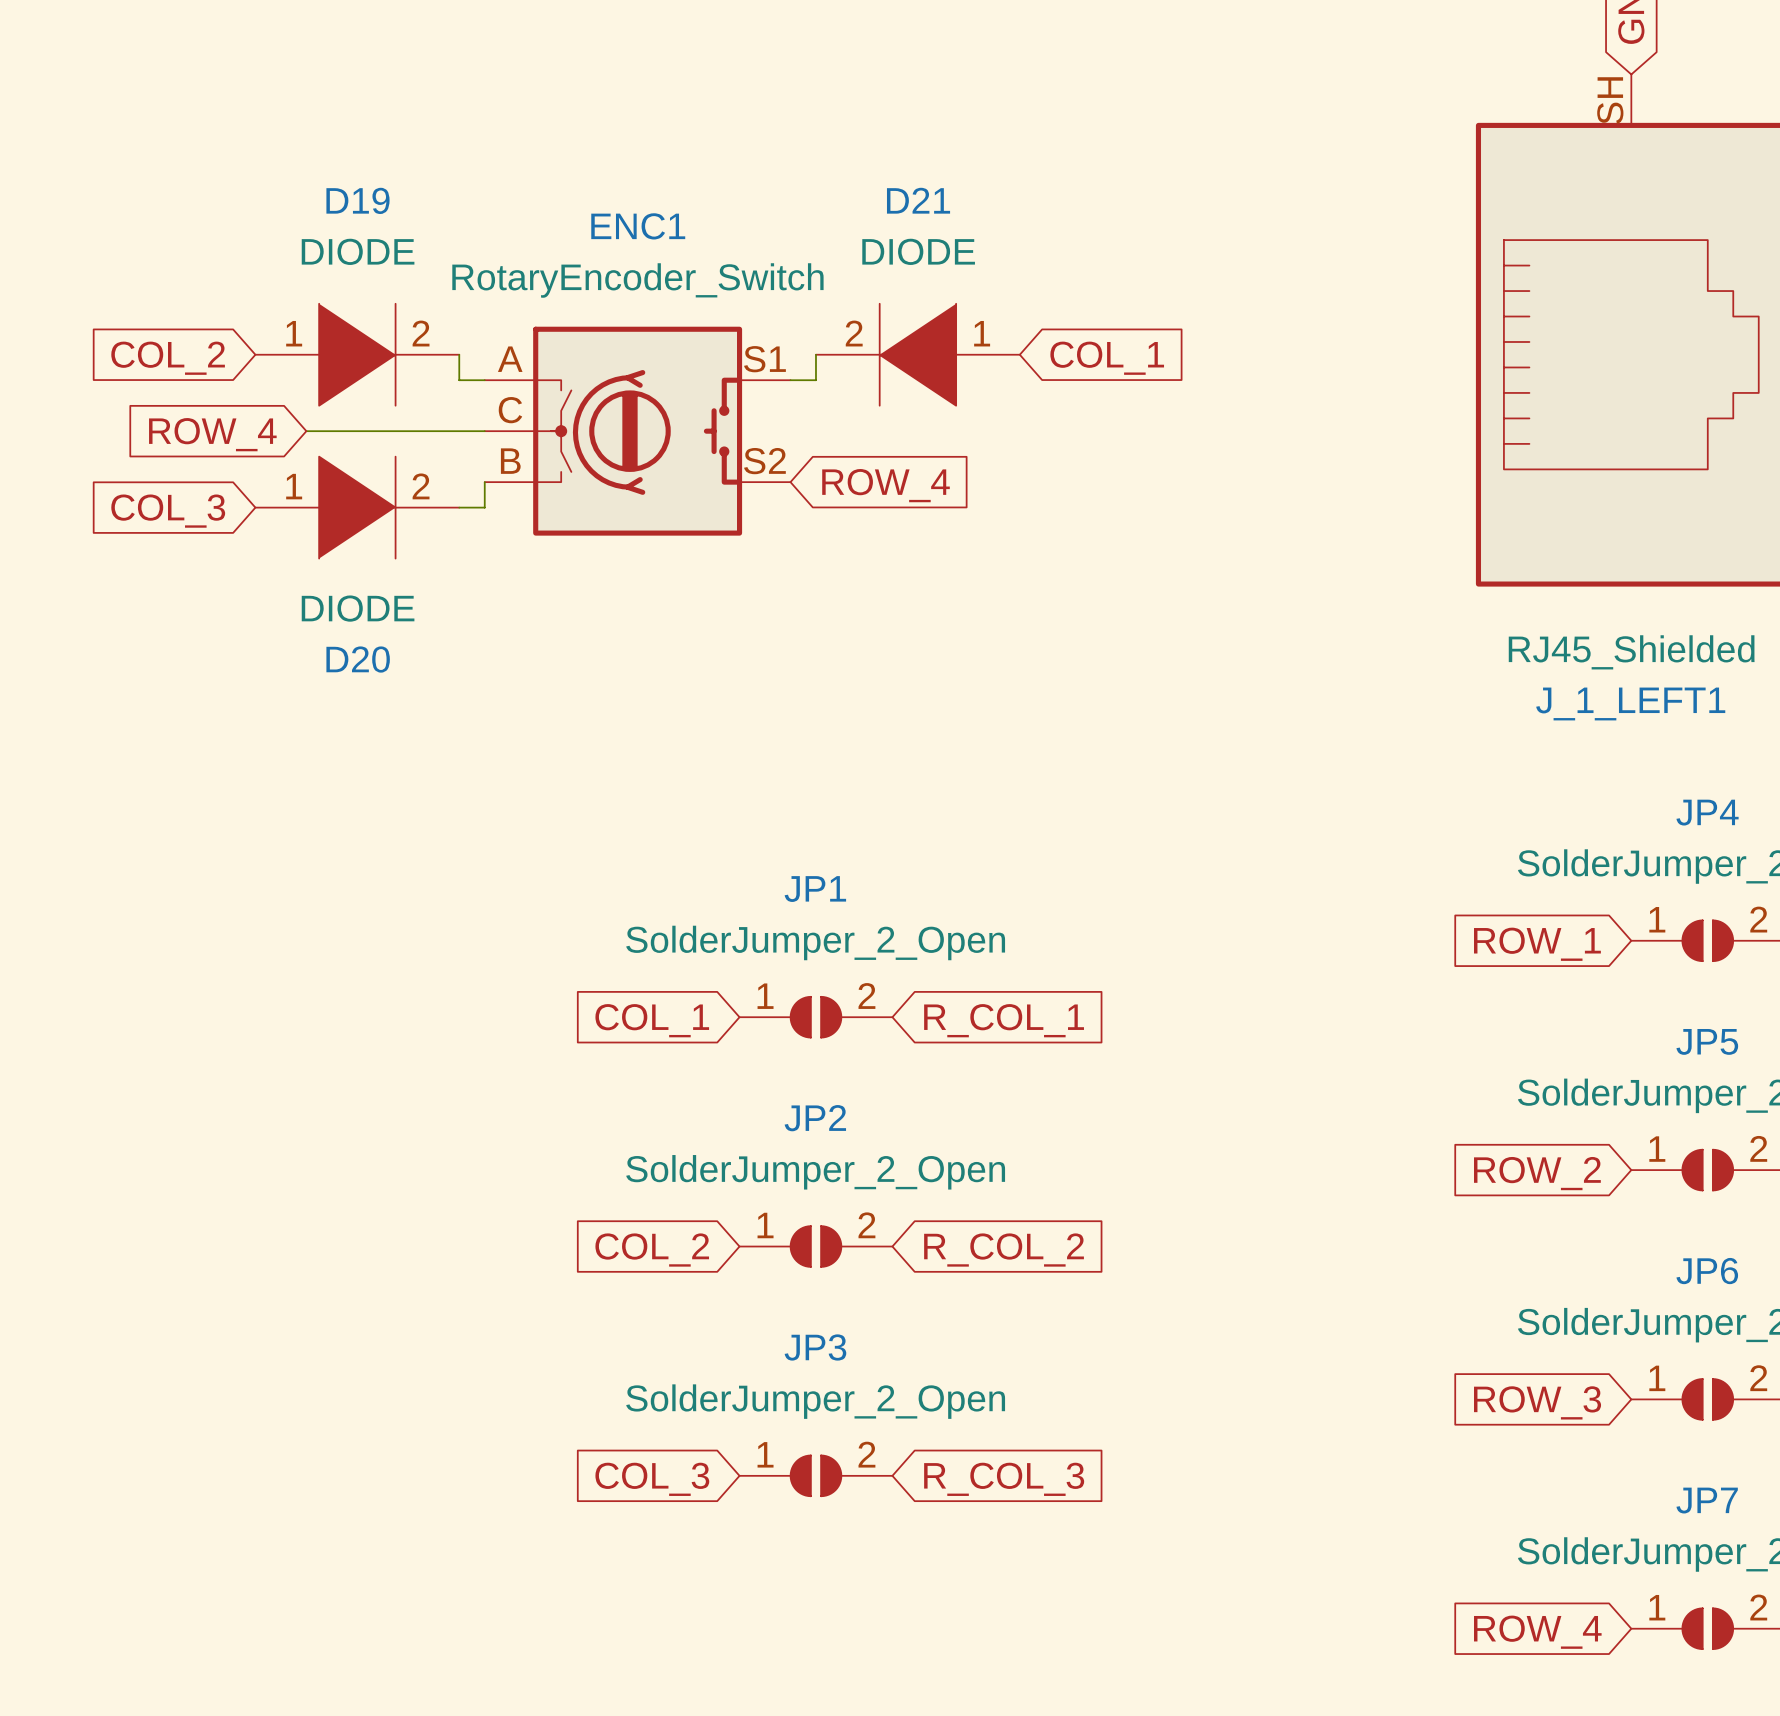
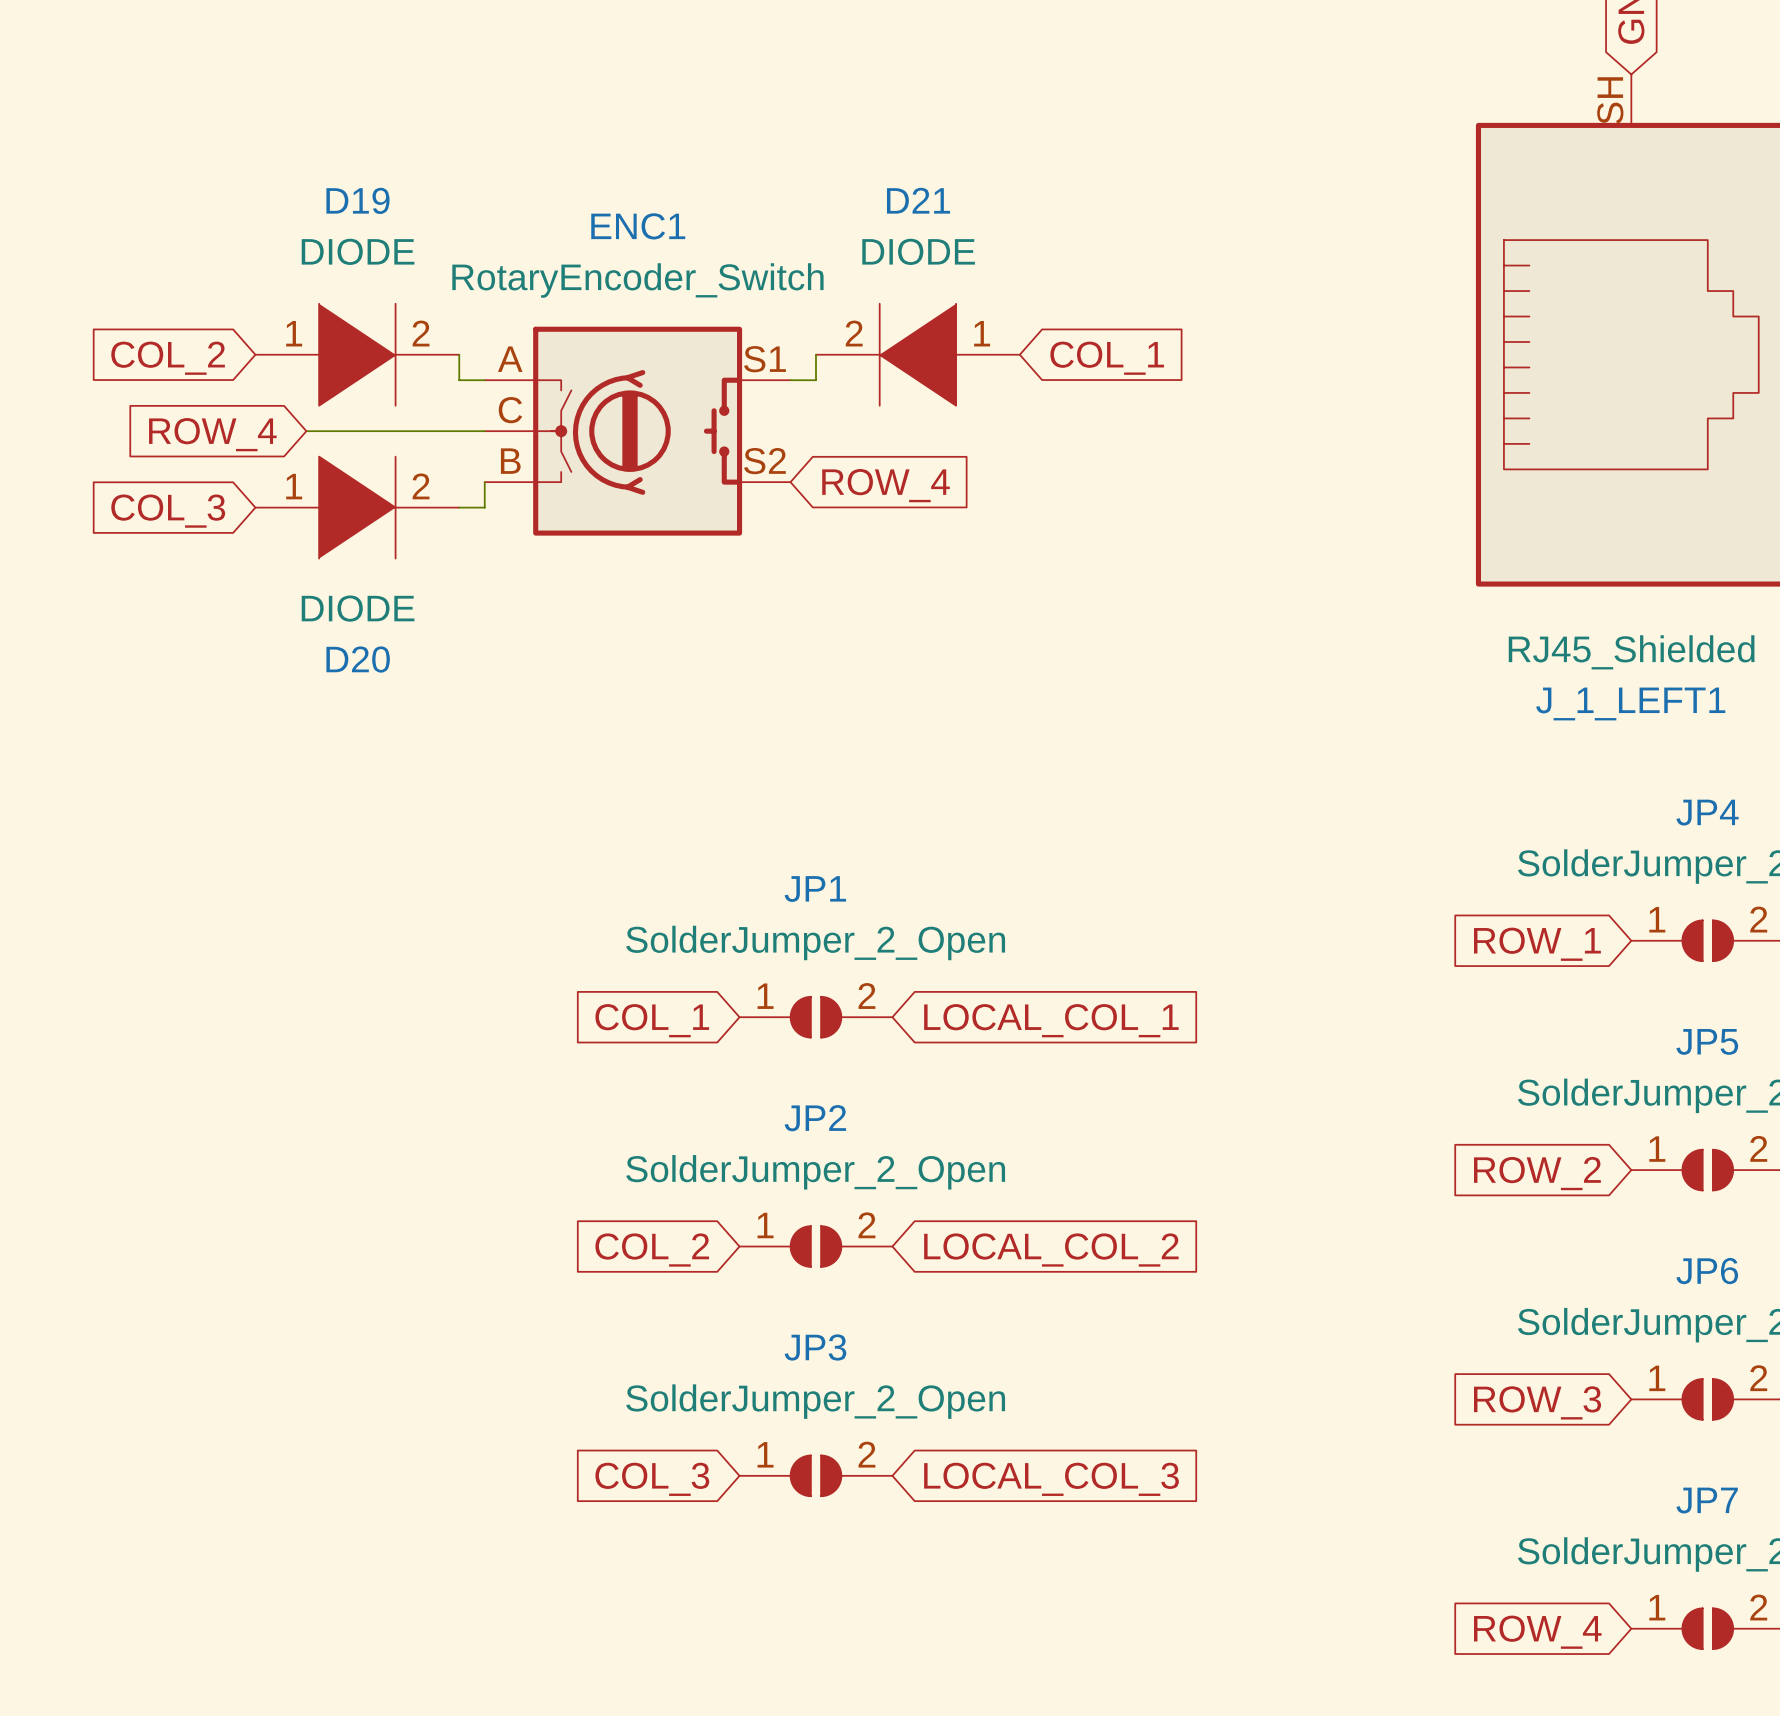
global label: R_COL_1 (1004, 1020) -> LOCAL_COL_1 (1051, 1020)
global label: R_COL_2 (1004, 1250) -> LOCAL_COL_2 (1051, 1250)
global label: R_COL_3 (1004, 1479) -> LOCAL_COL_3 (1051, 1479)

